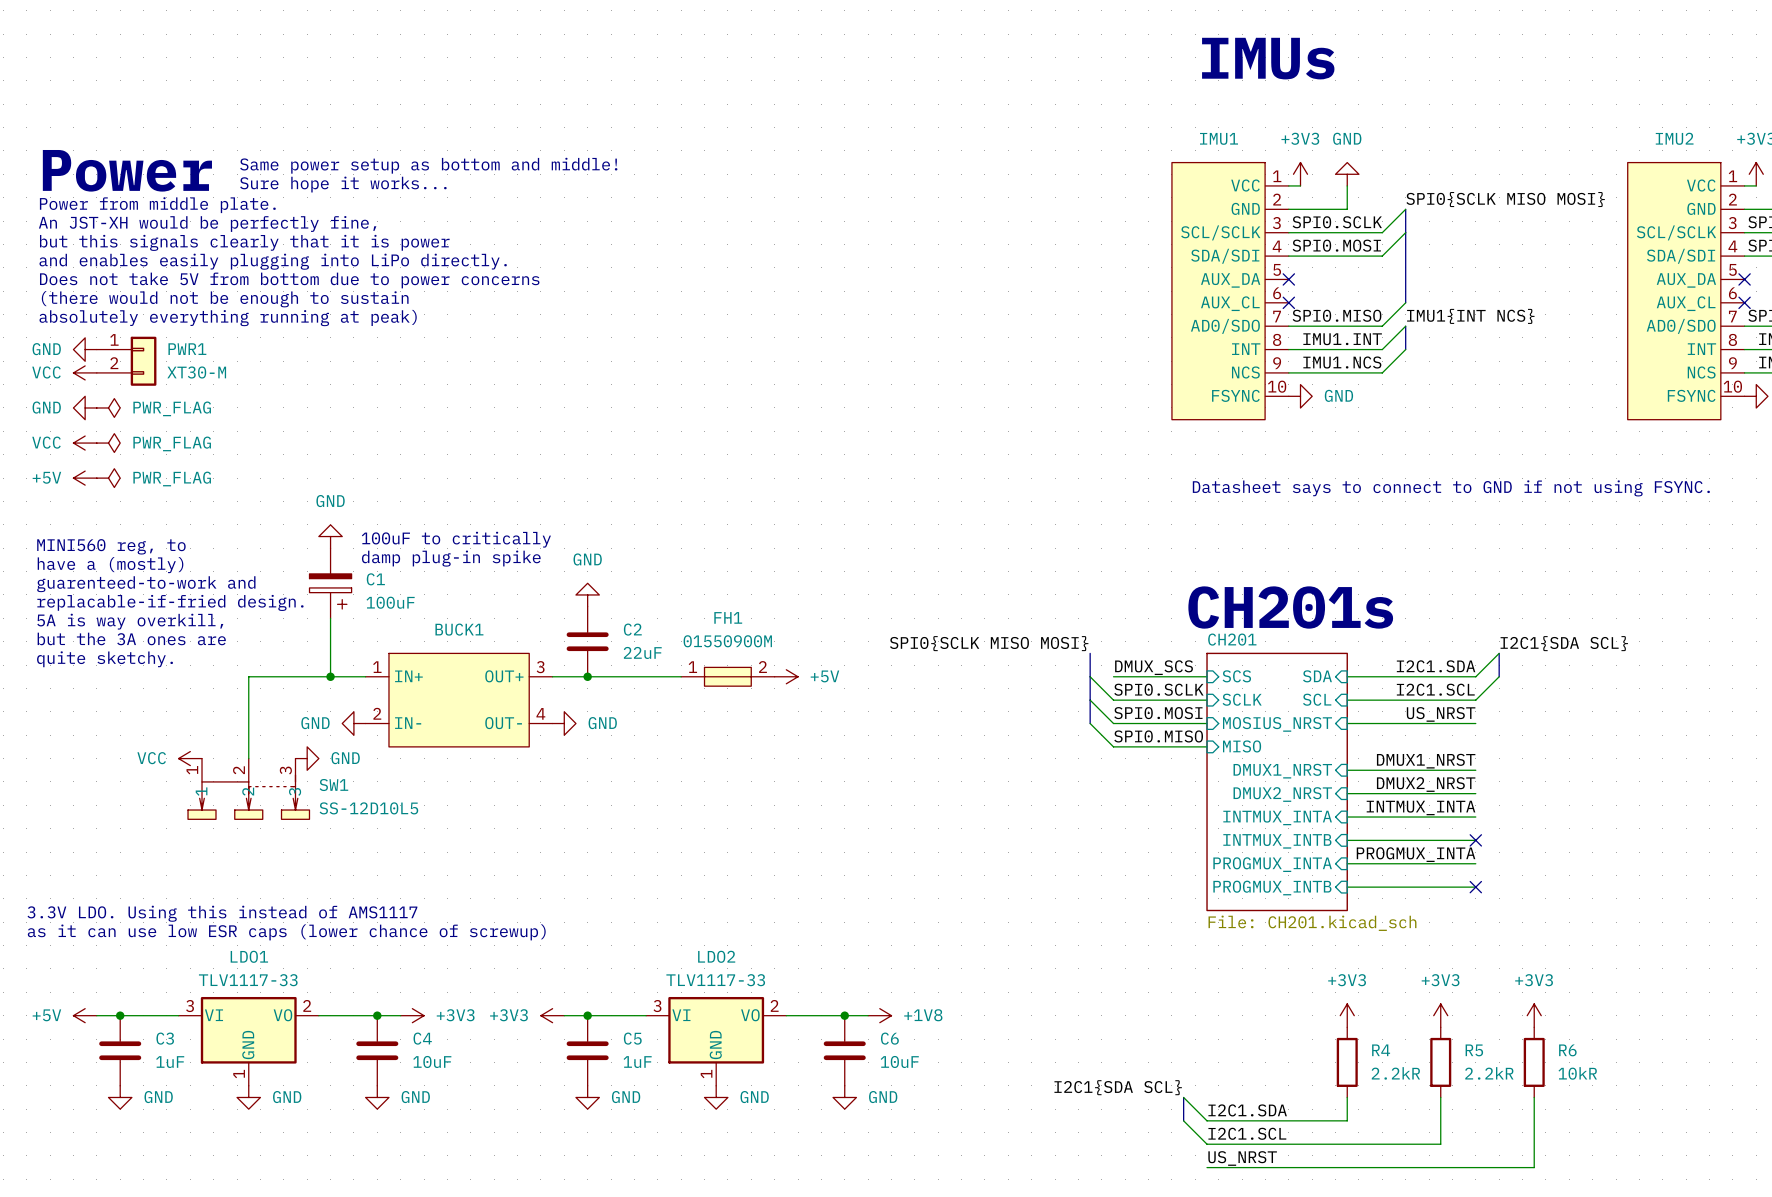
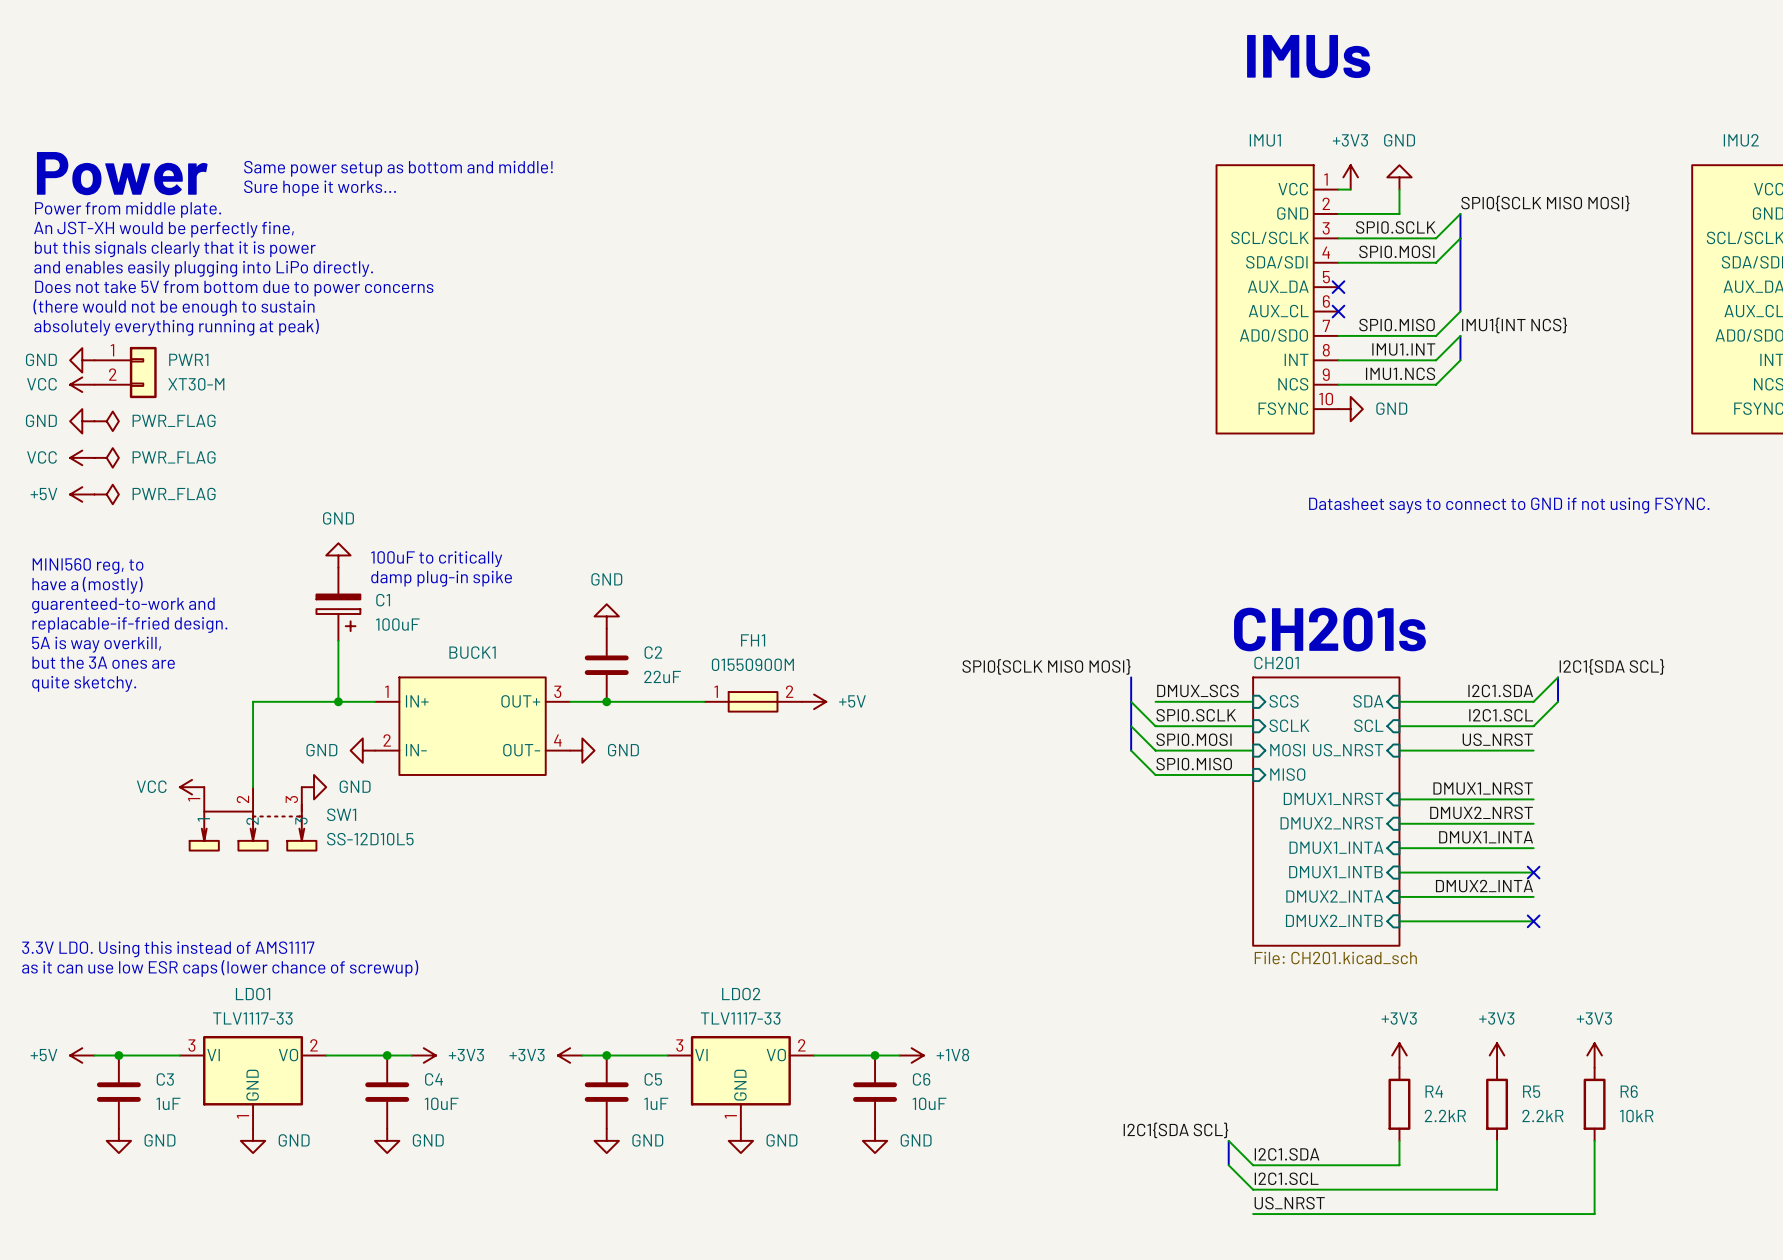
label: INTMUX_INTA (1421, 808) -> DMUX1_INTA (1486, 837)
sheet pin: INTMUX_INTA (1277, 817) -> DMUX1_INTA (1336, 847)
sheet pin: INTMUX_INTB (1277, 841) -> DMUX1_INTB (1335, 872)
label: PROGMUX_INTA (1416, 854) -> DMUX2_INTA (1484, 886)
sheet pin: PROGMUX_INTA (1272, 864) -> DMUX2_INTA (1334, 896)
sheet pin: PROGMUX_INTB (1272, 888) -> DMUX2_INTB (1334, 920)

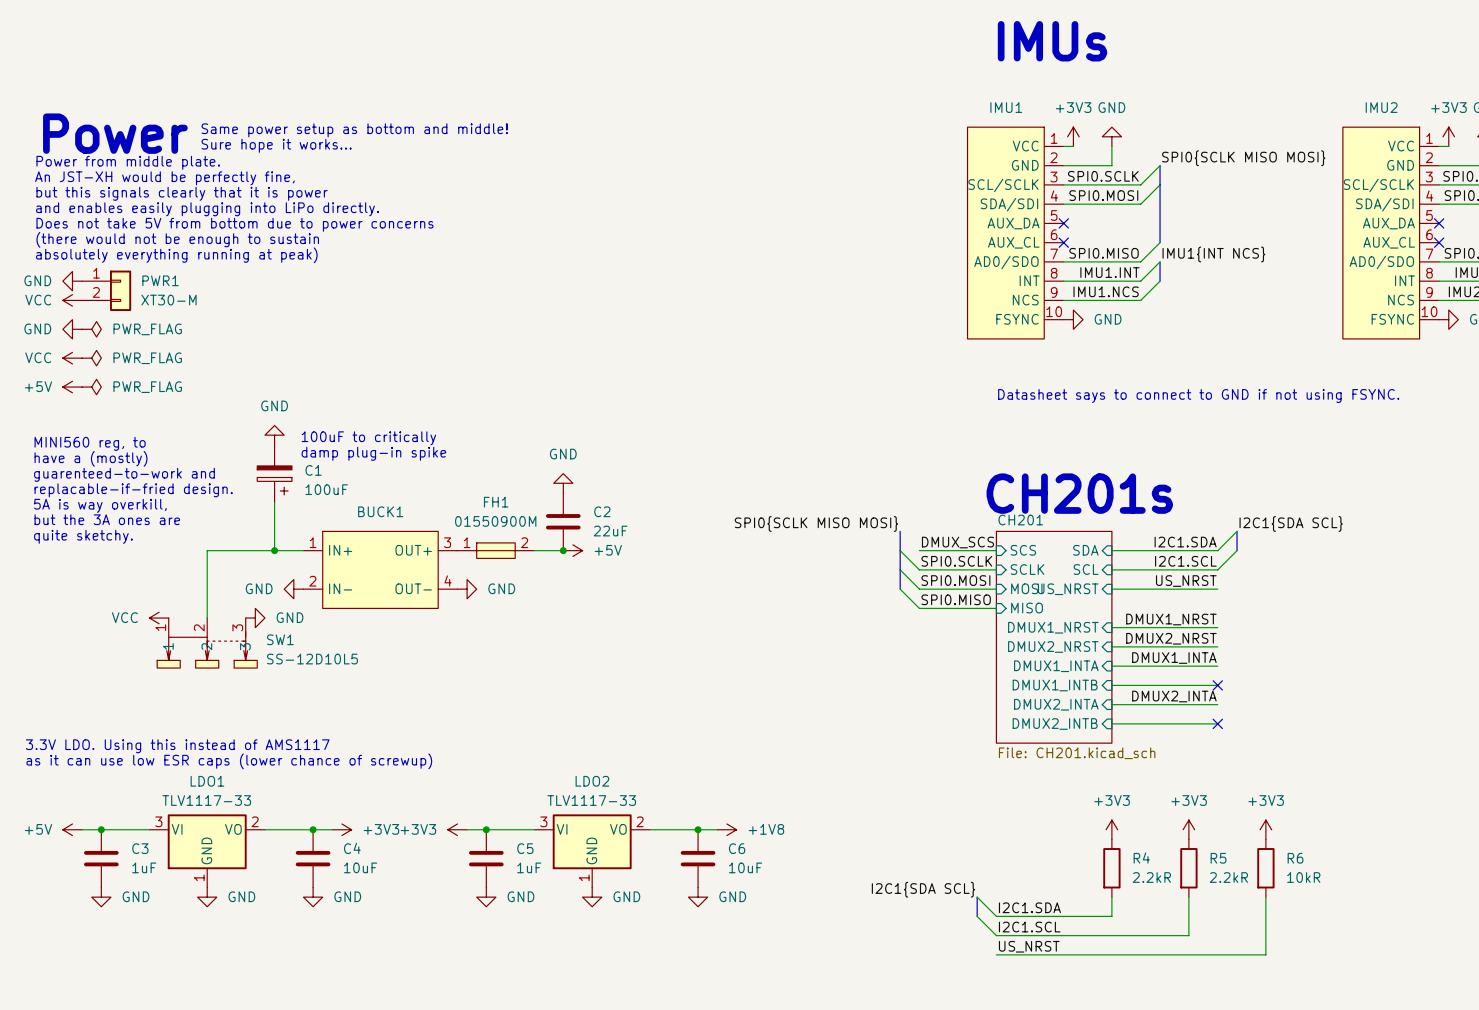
power symbol position: GND (606, 616) -> GND (563, 483)
C2 position: (606, 665) -> (563, 521)
junction: (606, 701) -> none
junction: none -> (563, 550)
FH1 position: (753, 701) -> (495, 550)
power symbol position: +5V (814, 701) -> +5V (572, 550)

